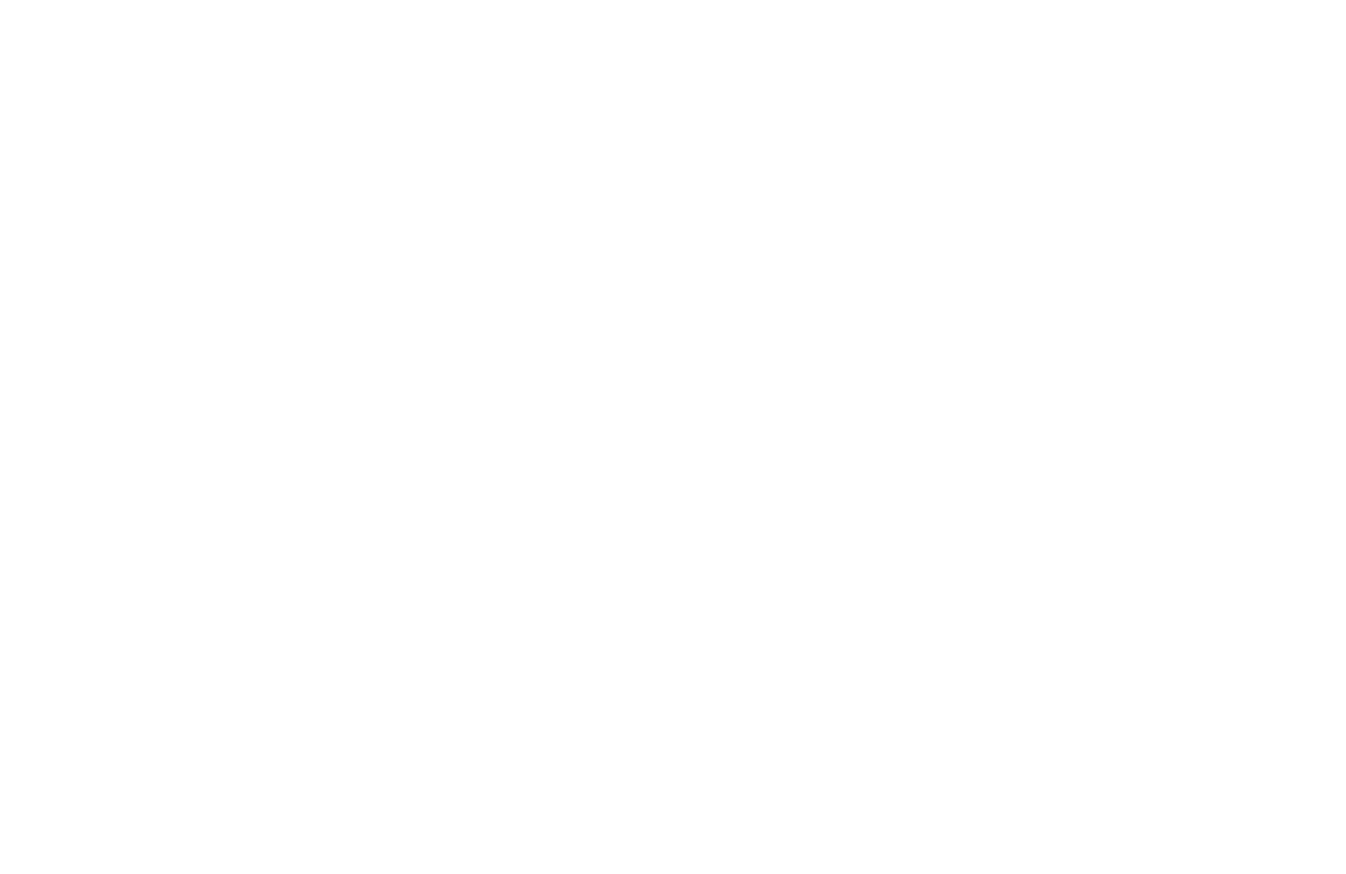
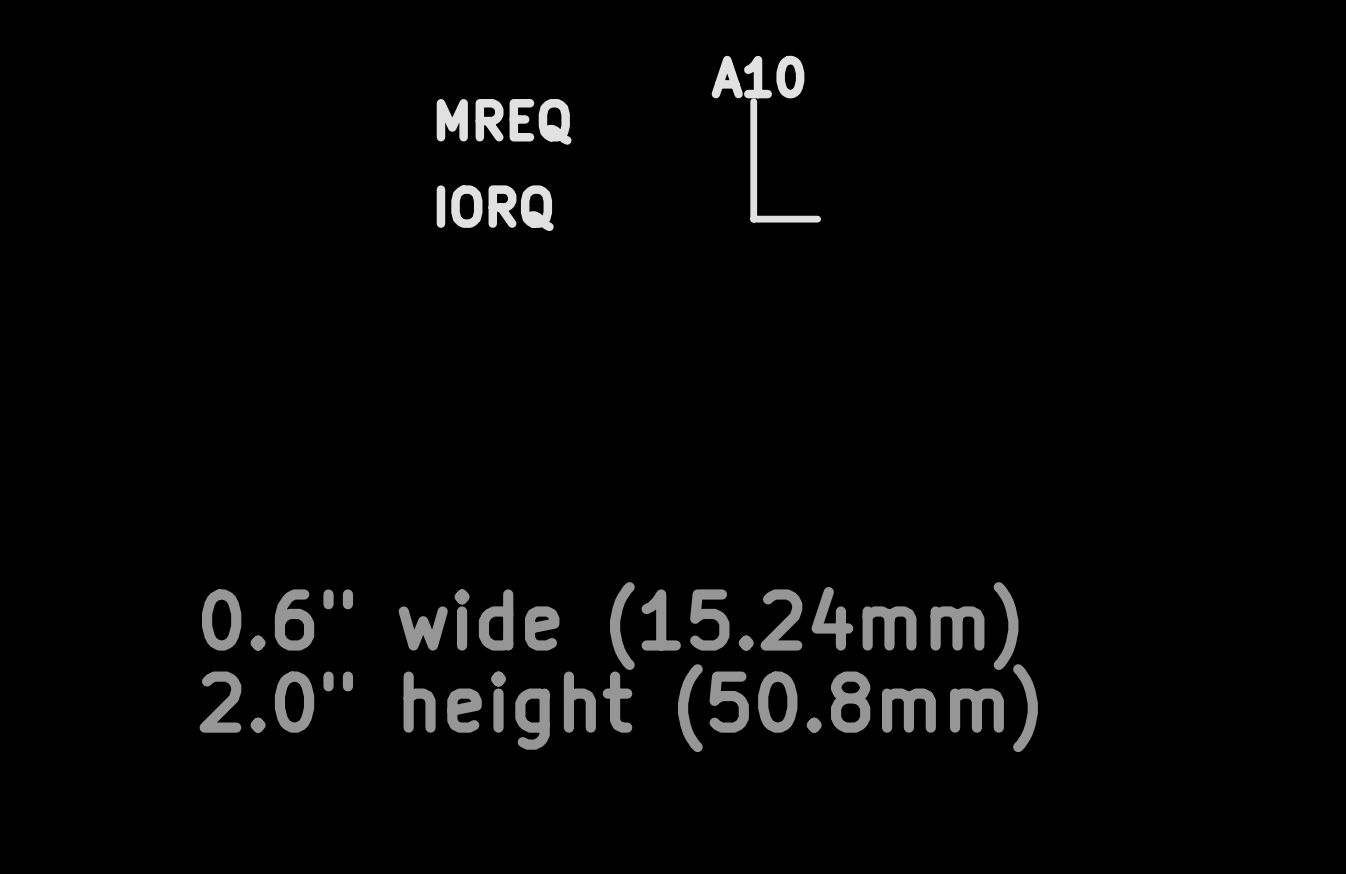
text: none -> A10 (758, 77)
line: none -> (753, 101) (753, 219) (817, 219)
text: none -> MREQ (504, 121)
text: none -> IORQ (495, 208)
text: none -> 0.6" wide (15.24mm) (610, 626)
text: none -> 2.0" height (50.8mm) (618, 708)

